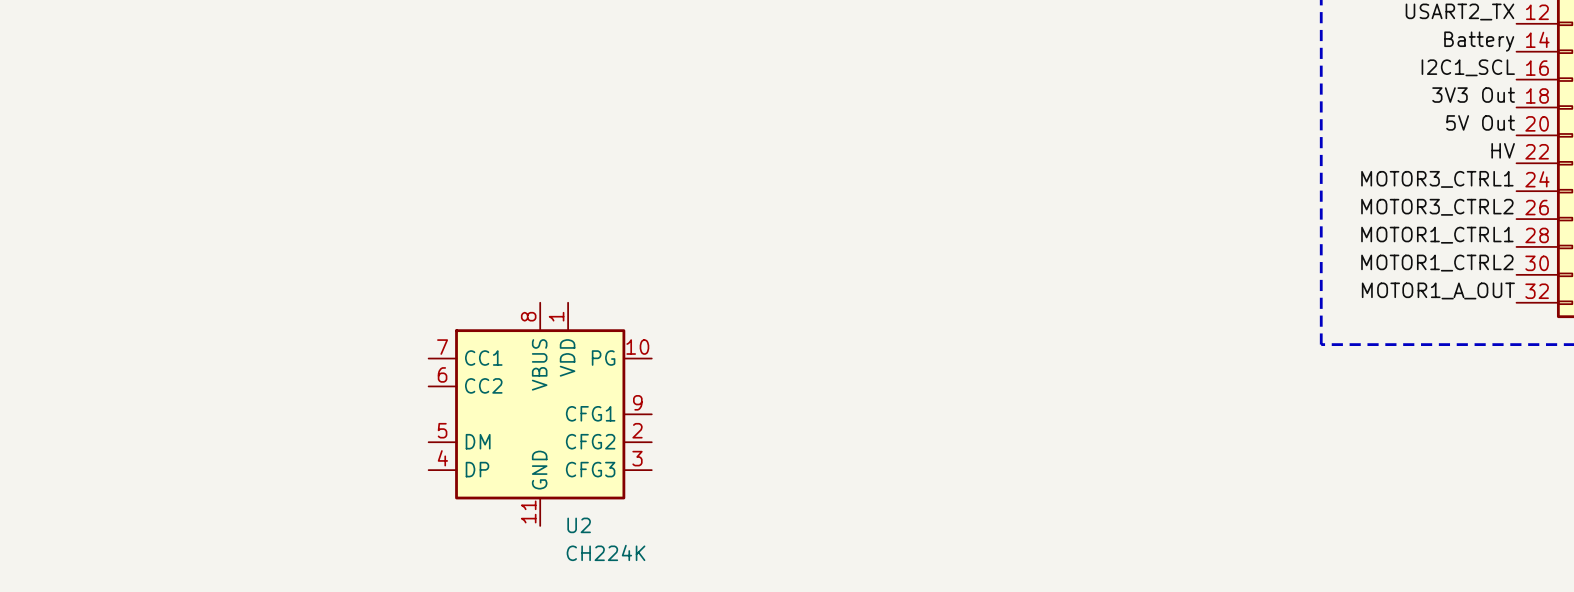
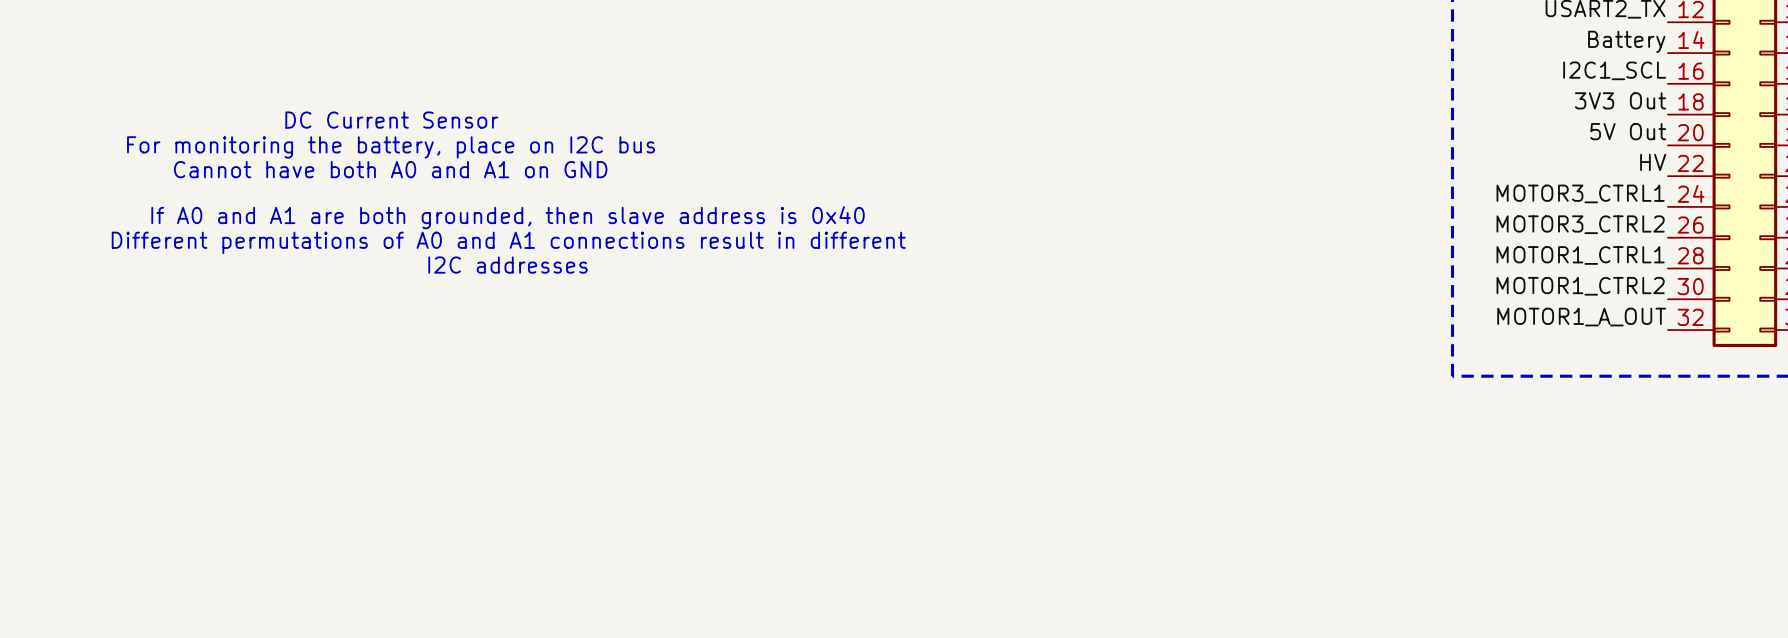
text: none -> DC Current Sensor (391, 120)
text: none -> For monitoring the battery, place on I2C bus (391, 147)
text: none -> Cannot have both A0 and A1 on GND (390, 169)
text: none -> If A0 and A1 are both grounded, then slave address is 0x40 (508, 217)
text: none -> Different permutations of A0 and A1 connections result in different (508, 242)
text: none -> I2C addresses (508, 265)
U2: CH224K (540, 414) -> none

